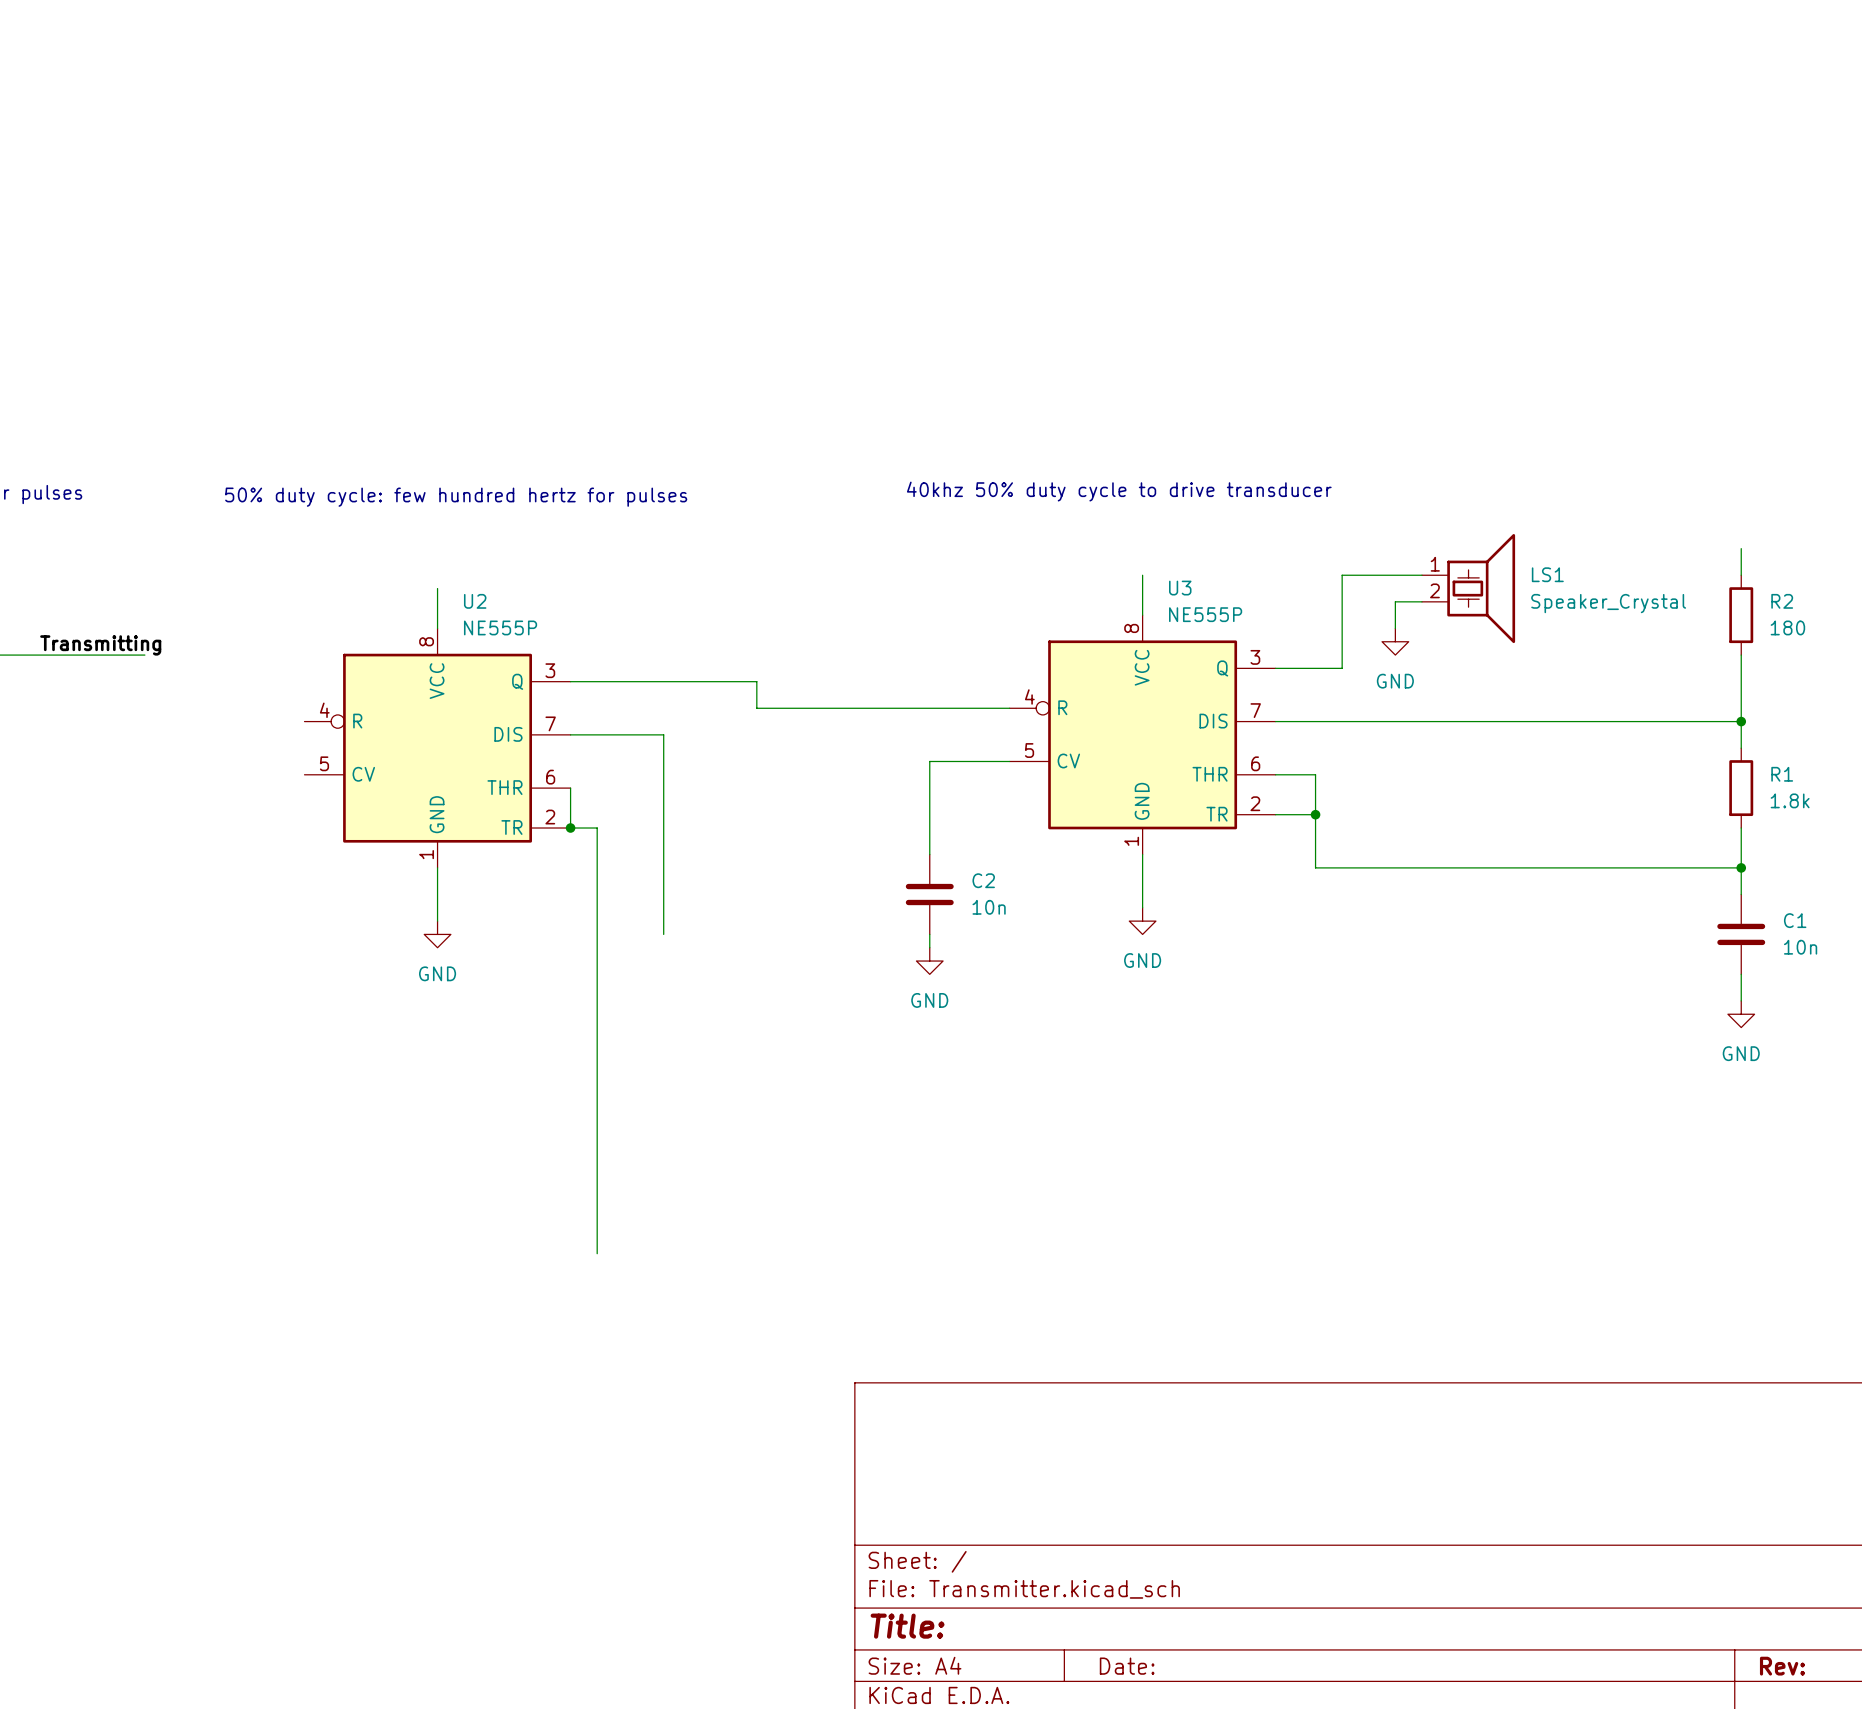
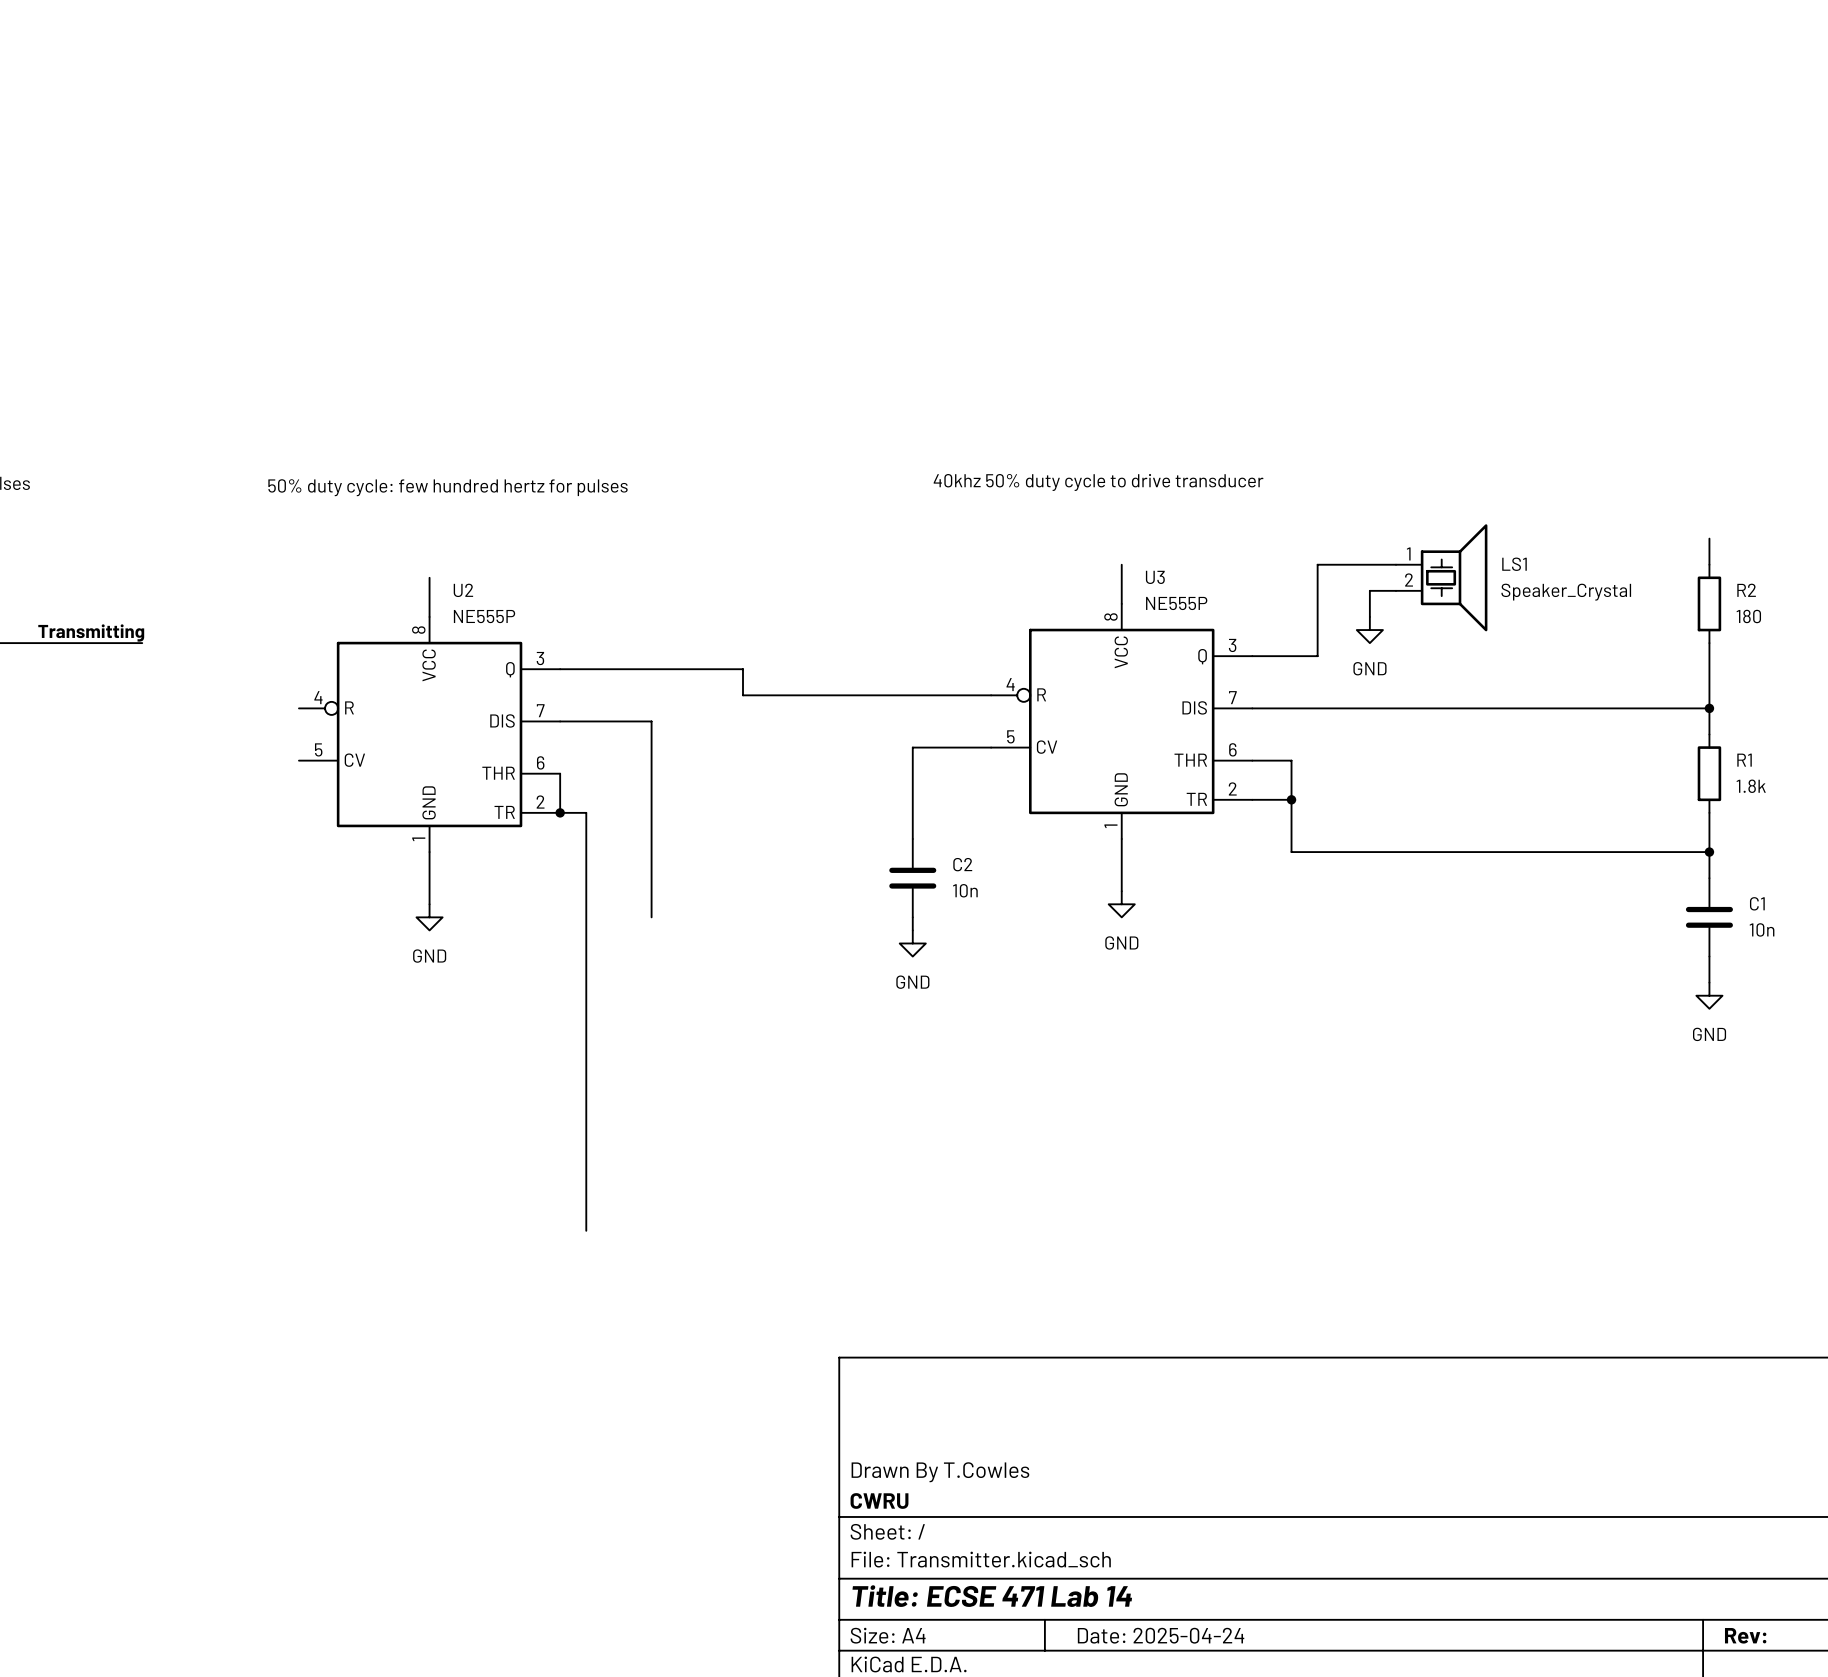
title block: none -> Drawn By T.Cowles (940, 1472)
title block: none -> CWRU (879, 1500)
title block: Title: (907, 1626) -> Title: ECSE 471 Lab 14 (992, 1596)
title block: Date: (1127, 1666) -> Date: 2025-04-24 (1161, 1635)

